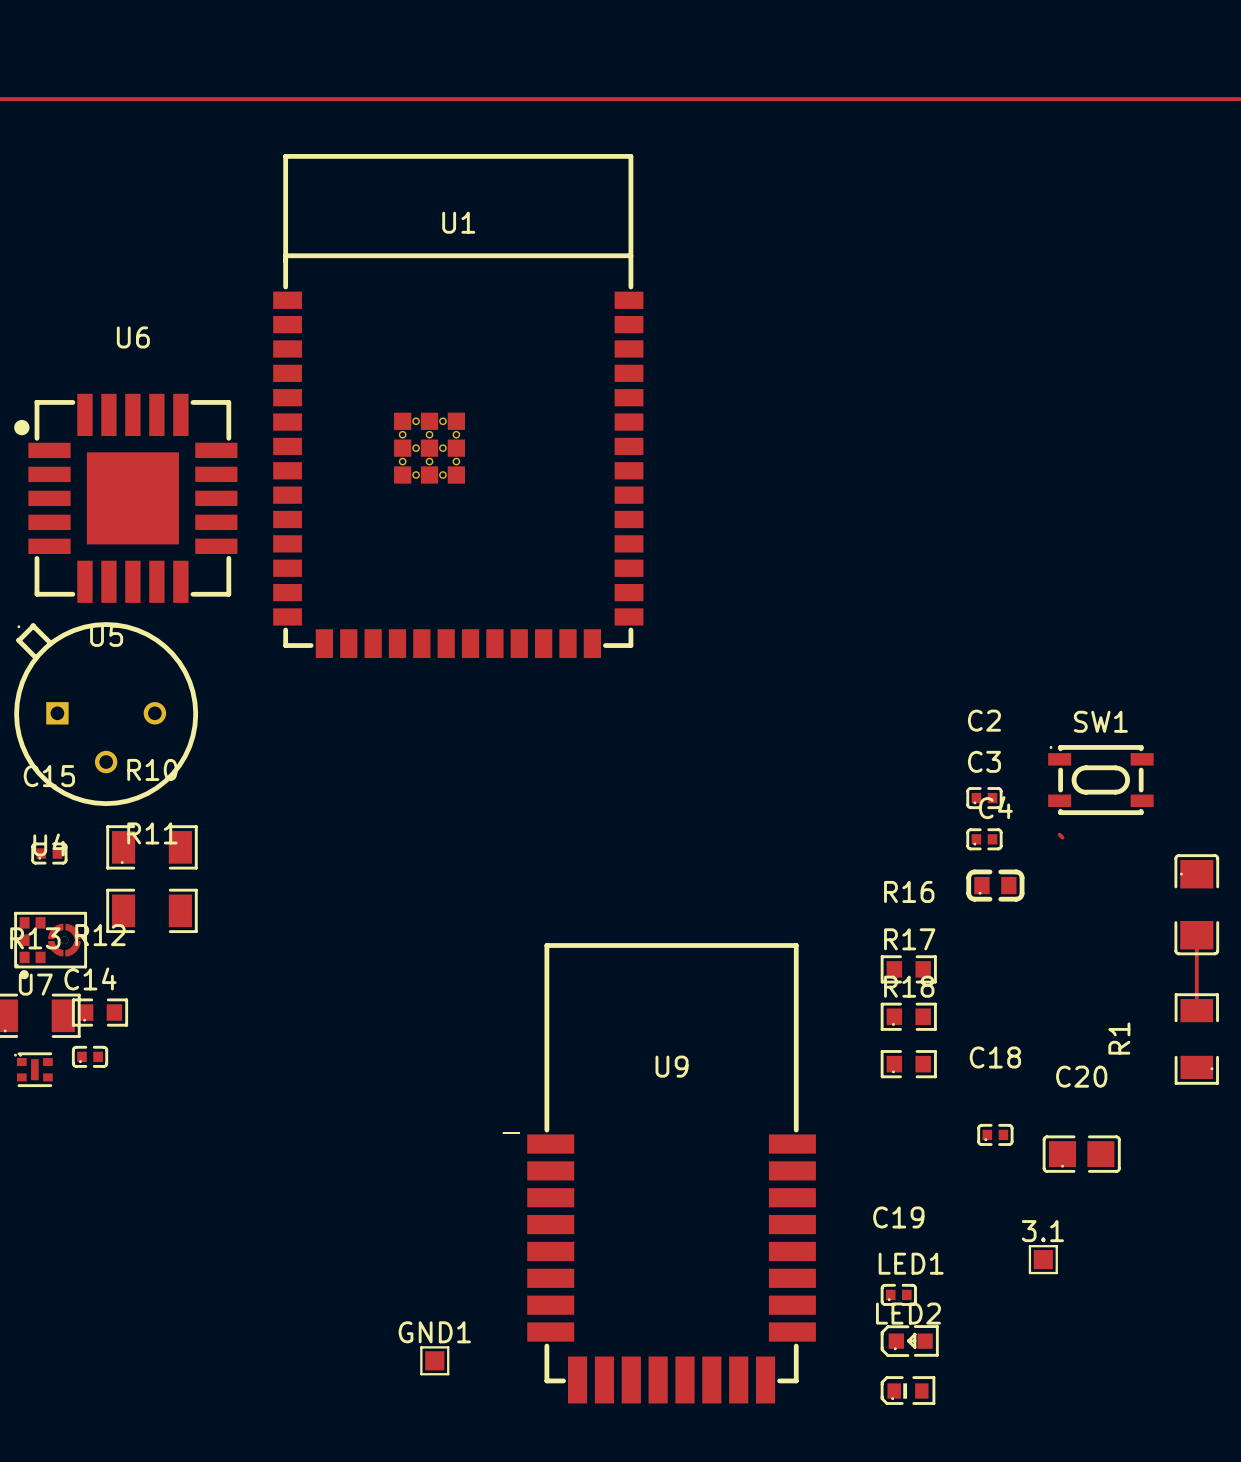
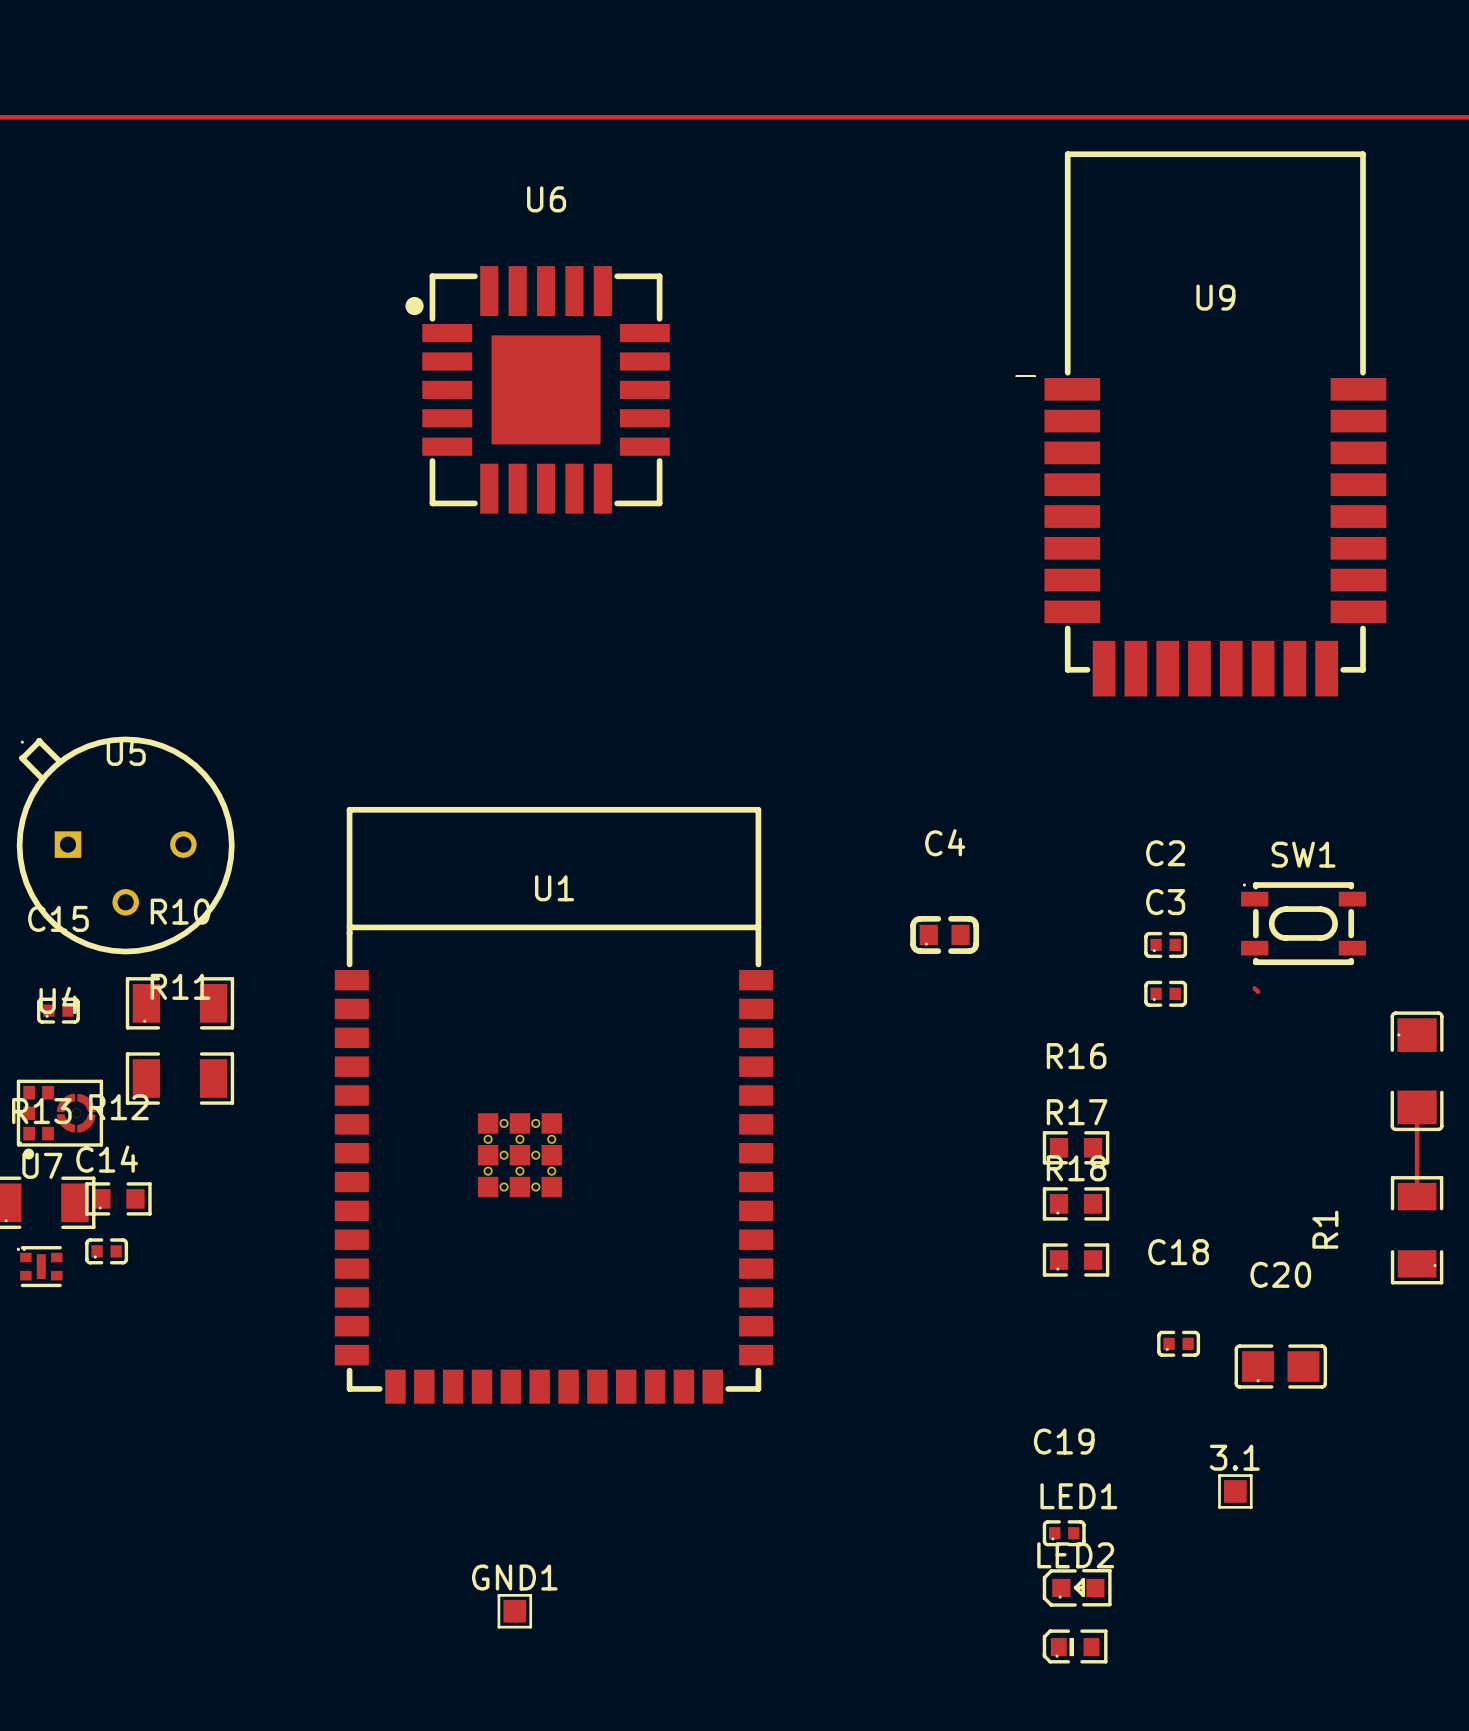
U1 position: (458, 406) -> (553, 1105)
U6 position: (125, 498) -> (537, 389)
C4 position: (995, 885) -> (944, 934)
U9 position: (659, 1173) -> (1201, 423)

